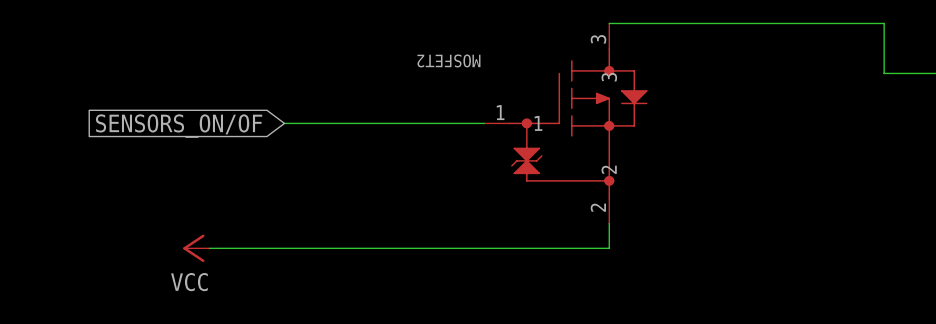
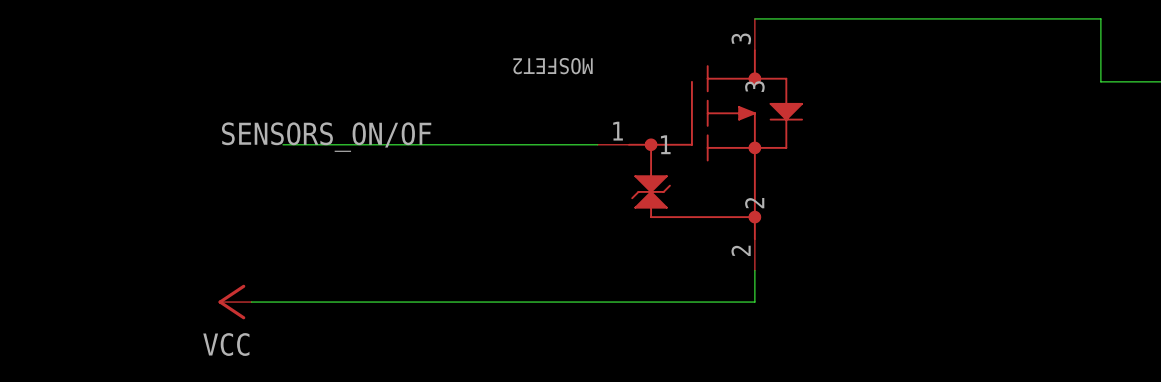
label: none -> SENSORS_ON/OF (326, 137)
wire: none -> (283, 144) (345, 144)
global label: SENSORS_ON/OF (179, 126) -> none

